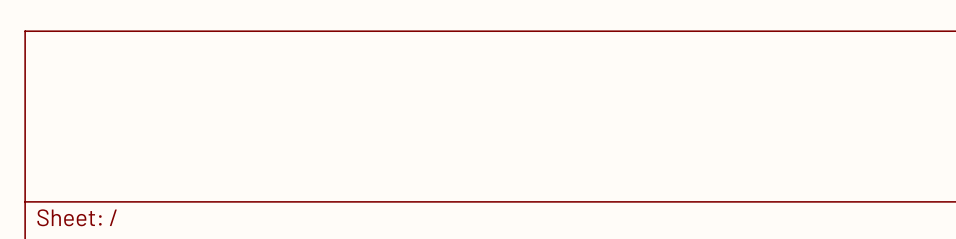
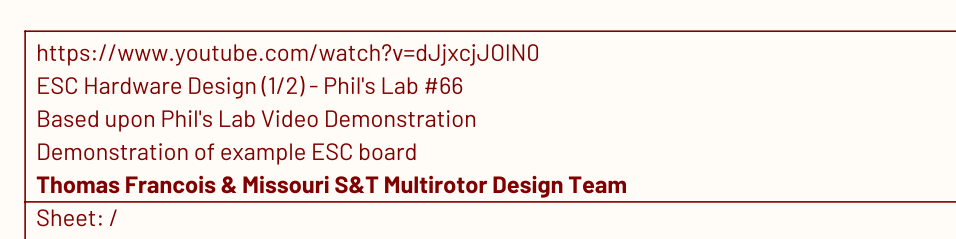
title block: none -> https://www.youtube.com/watch?v=dJjxcjJOlN0 (288, 54)
title block: none -> ESC Hardware Design (1/2) - Phil's Lab #66 (250, 87)
title block: none -> Based upon Phil's Lab Video Demonstration (256, 120)
title block: none -> Demonstration of example ESC board (226, 153)
title block: none -> Thomas Francois & Missouri S&T Multirotor Design Team (331, 186)

